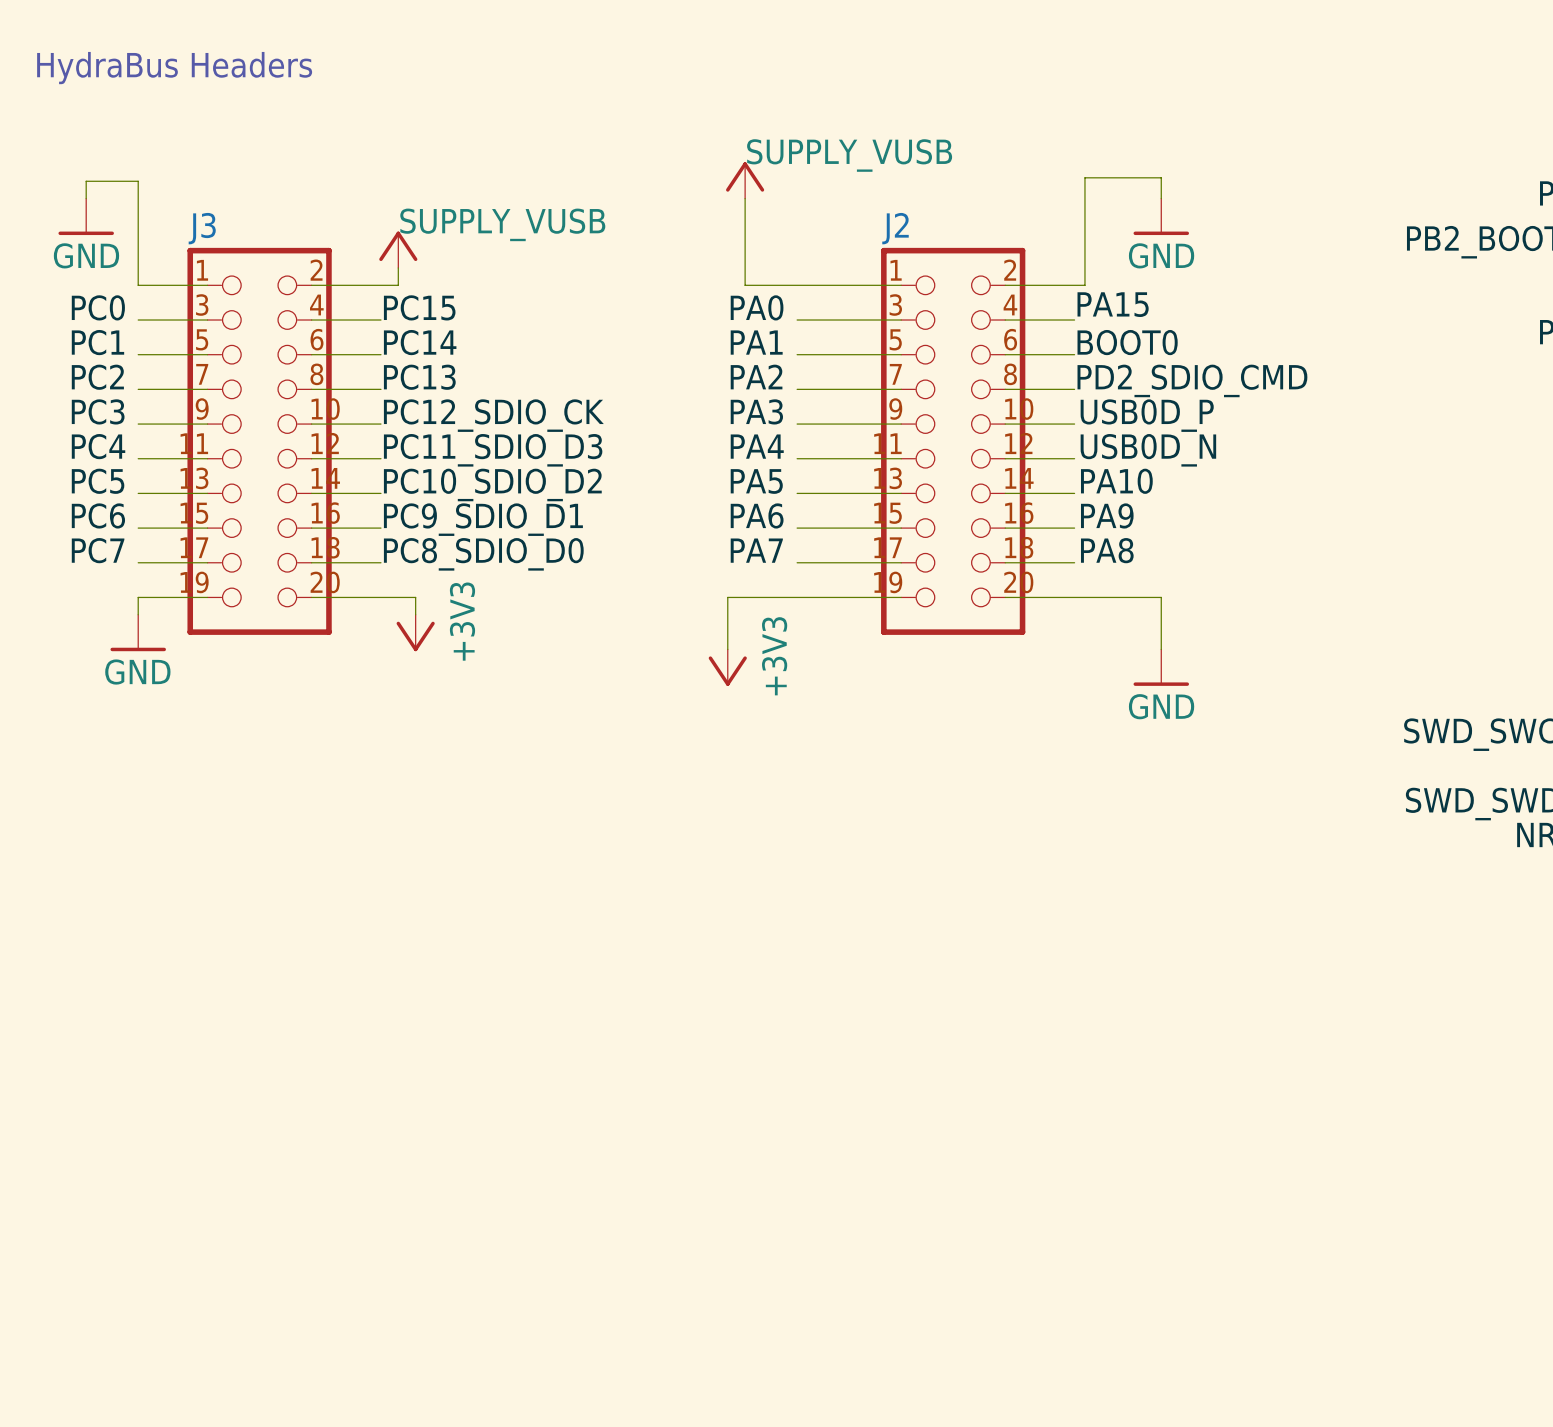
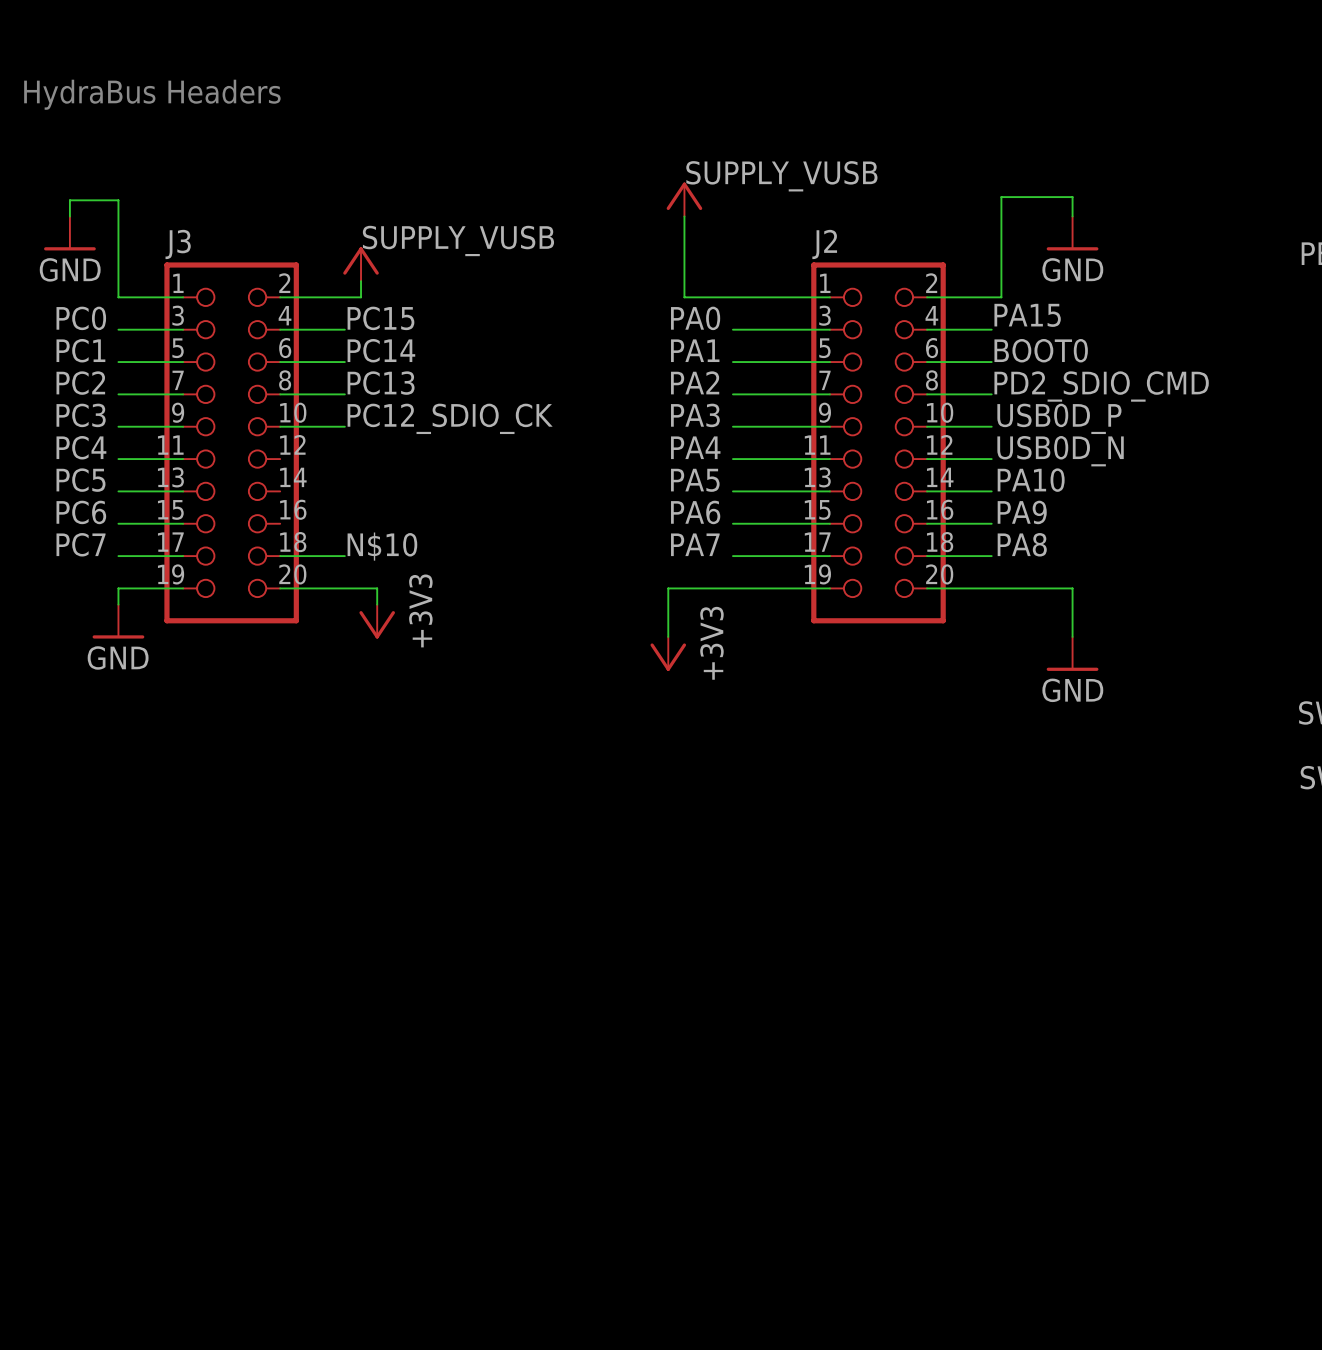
label: PC11_SDIO_D3 (493, 450) -> none
wire: (311, 458) (380, 458) -> none
label: PC10_SDIO_D2 (492, 484) -> none
wire: (311, 493) (380, 493) -> none
label: PC9_SDIO_D1 (483, 519) -> none
wire: (311, 528) (380, 528) -> none
label: PC8_SDIO_D0 (483, 554) -> N$10 (382, 546)

